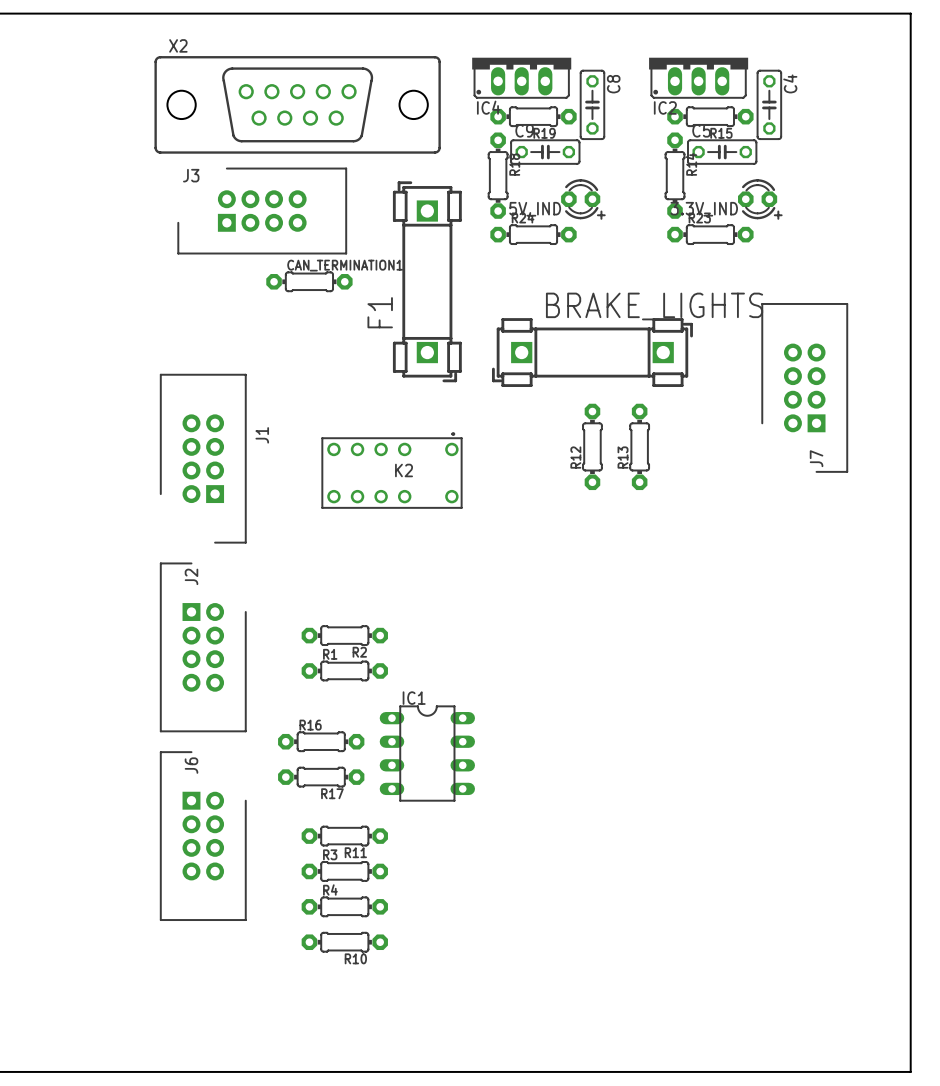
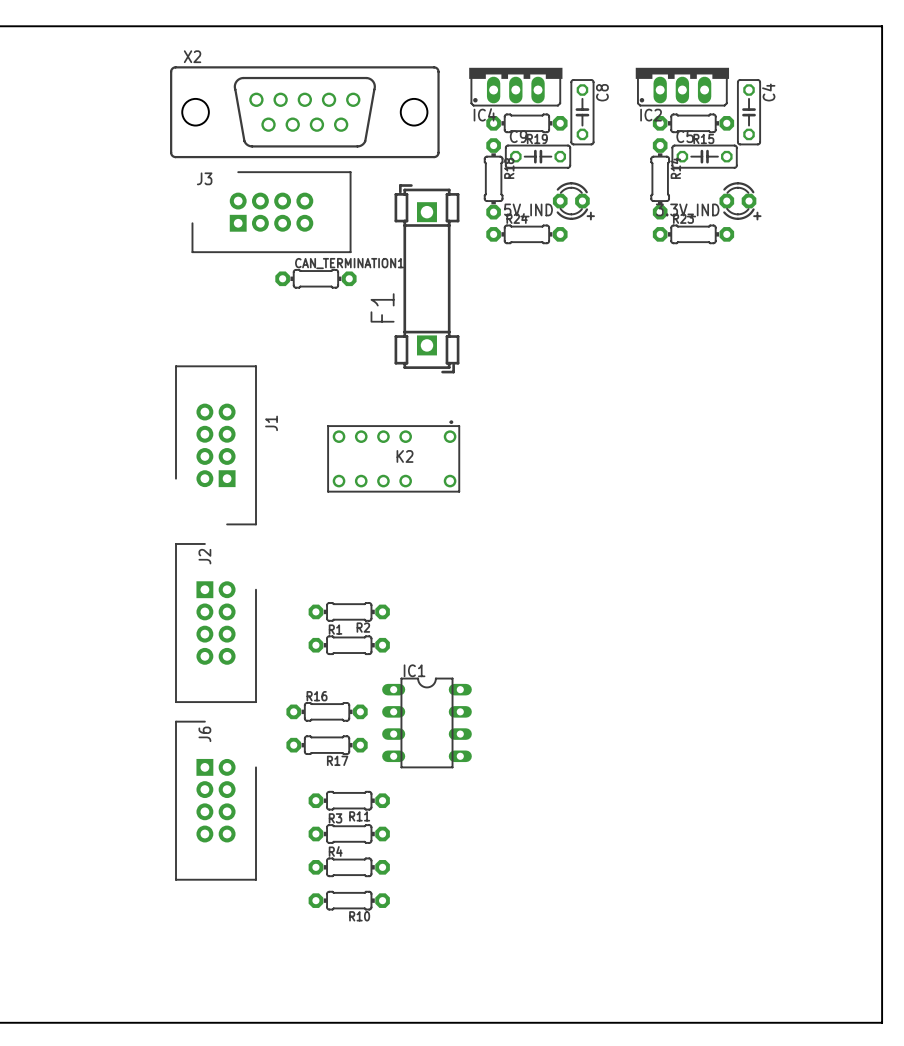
BRAKE_LIGHTS: (592, 352) -> none
J7: (804, 387) -> none
R12: (592, 446) -> none
R13: (639, 446) -> none

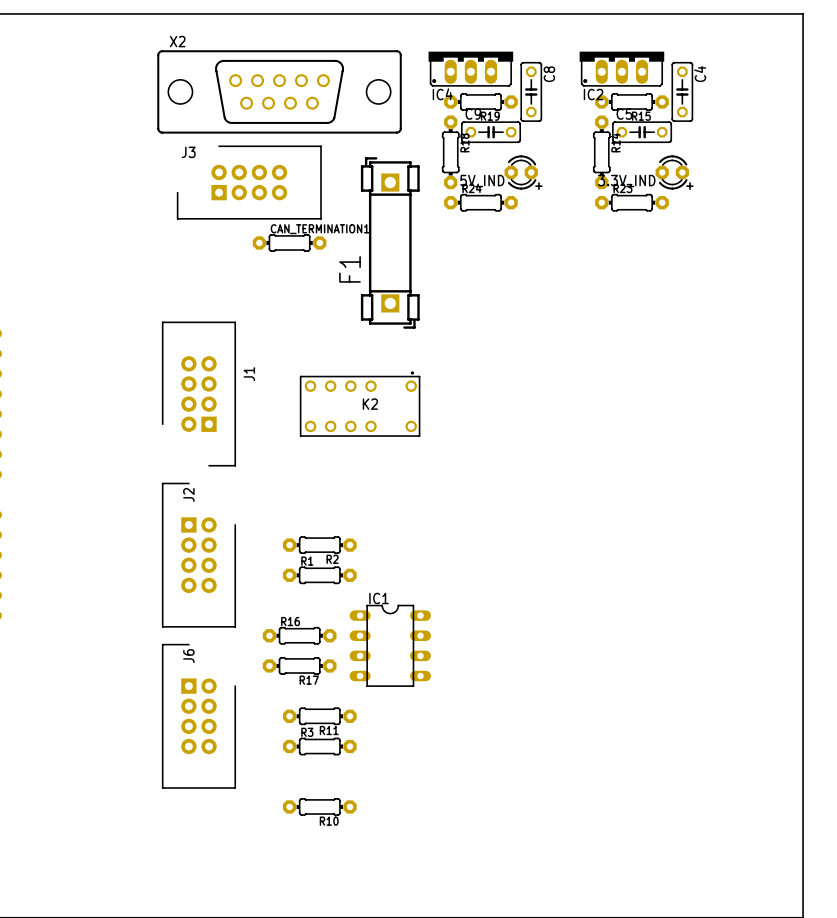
R4: (349, 867) -> none

